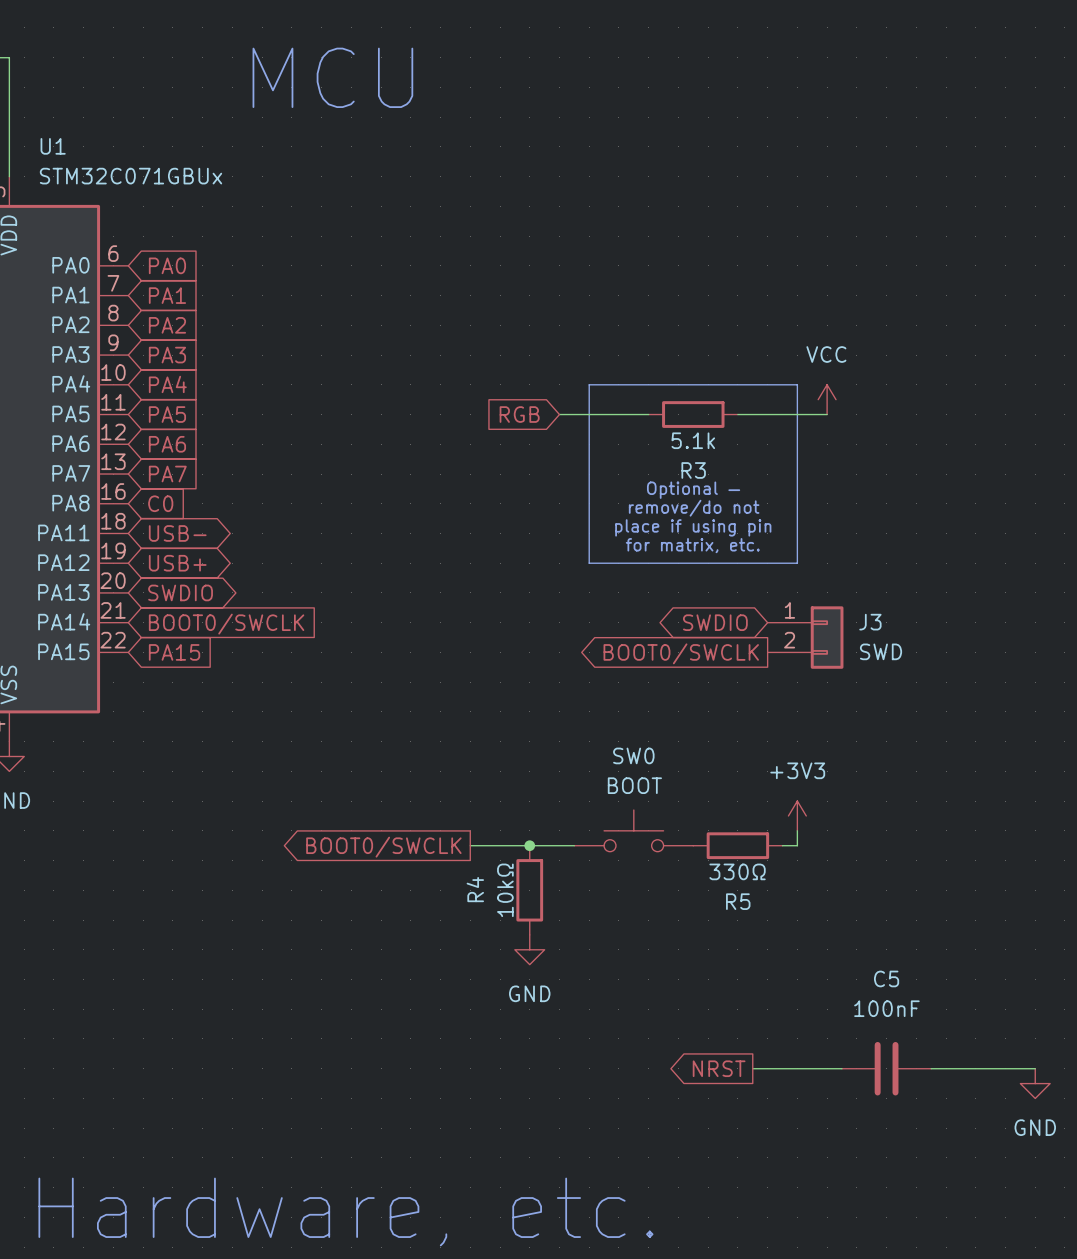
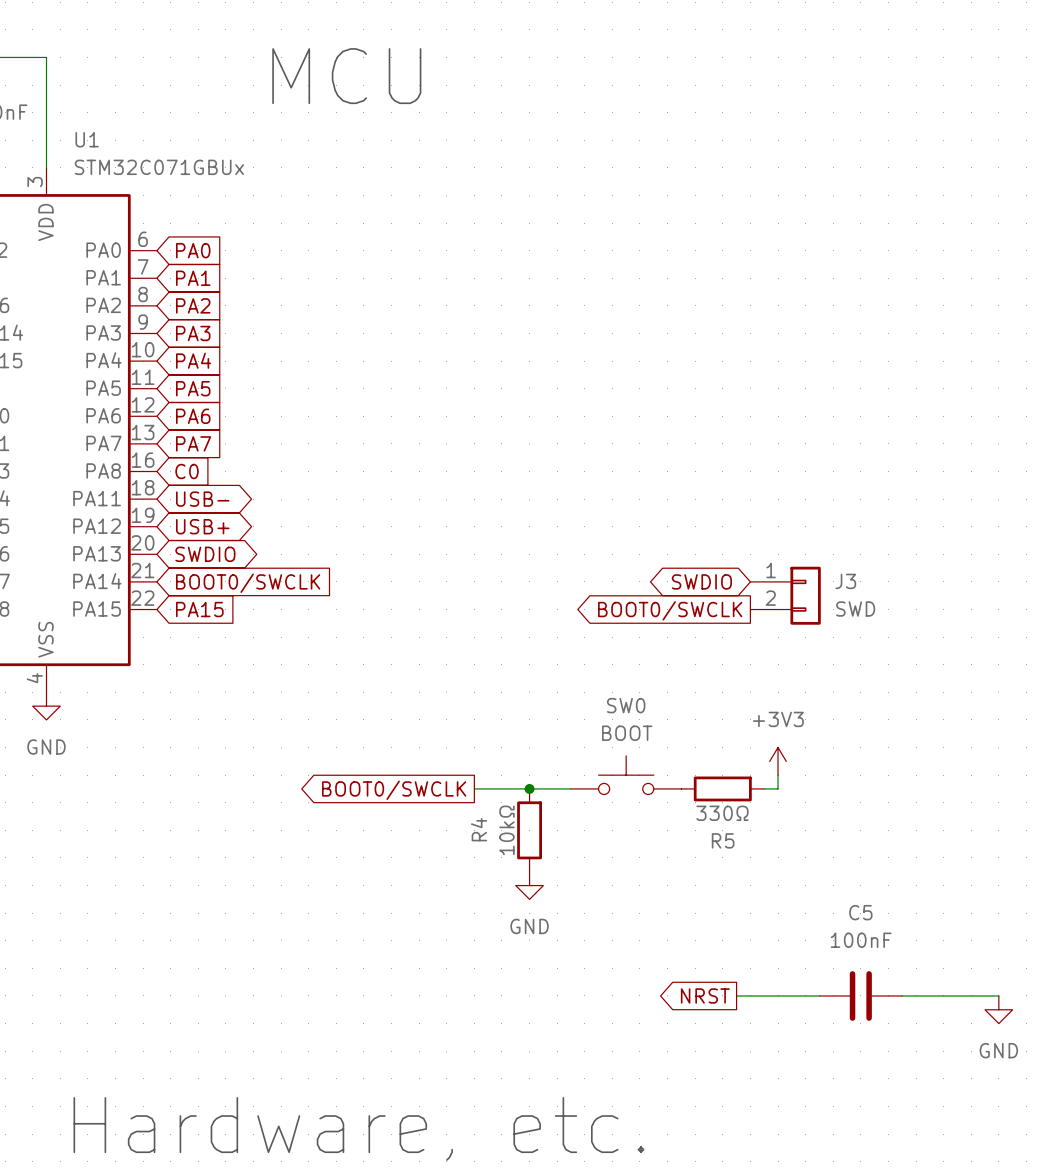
line: (589, 384) (797, 384) (797, 563) (589, 563) (589, 384) -> none
power symbol: VCC (827, 399) -> none
global label: RGB (519, 414) -> none
wire: (559, 414) (648, 414) -> none
R3: 5.1k (693, 414) -> none
wire: (737, 414) (827, 414) -> none
text: Optional — (693, 490) -> none
text: remove/do not (694, 508) -> none
text: place if using pin (693, 527) -> none
text: for matrix, etc. (692, 545) -> none

